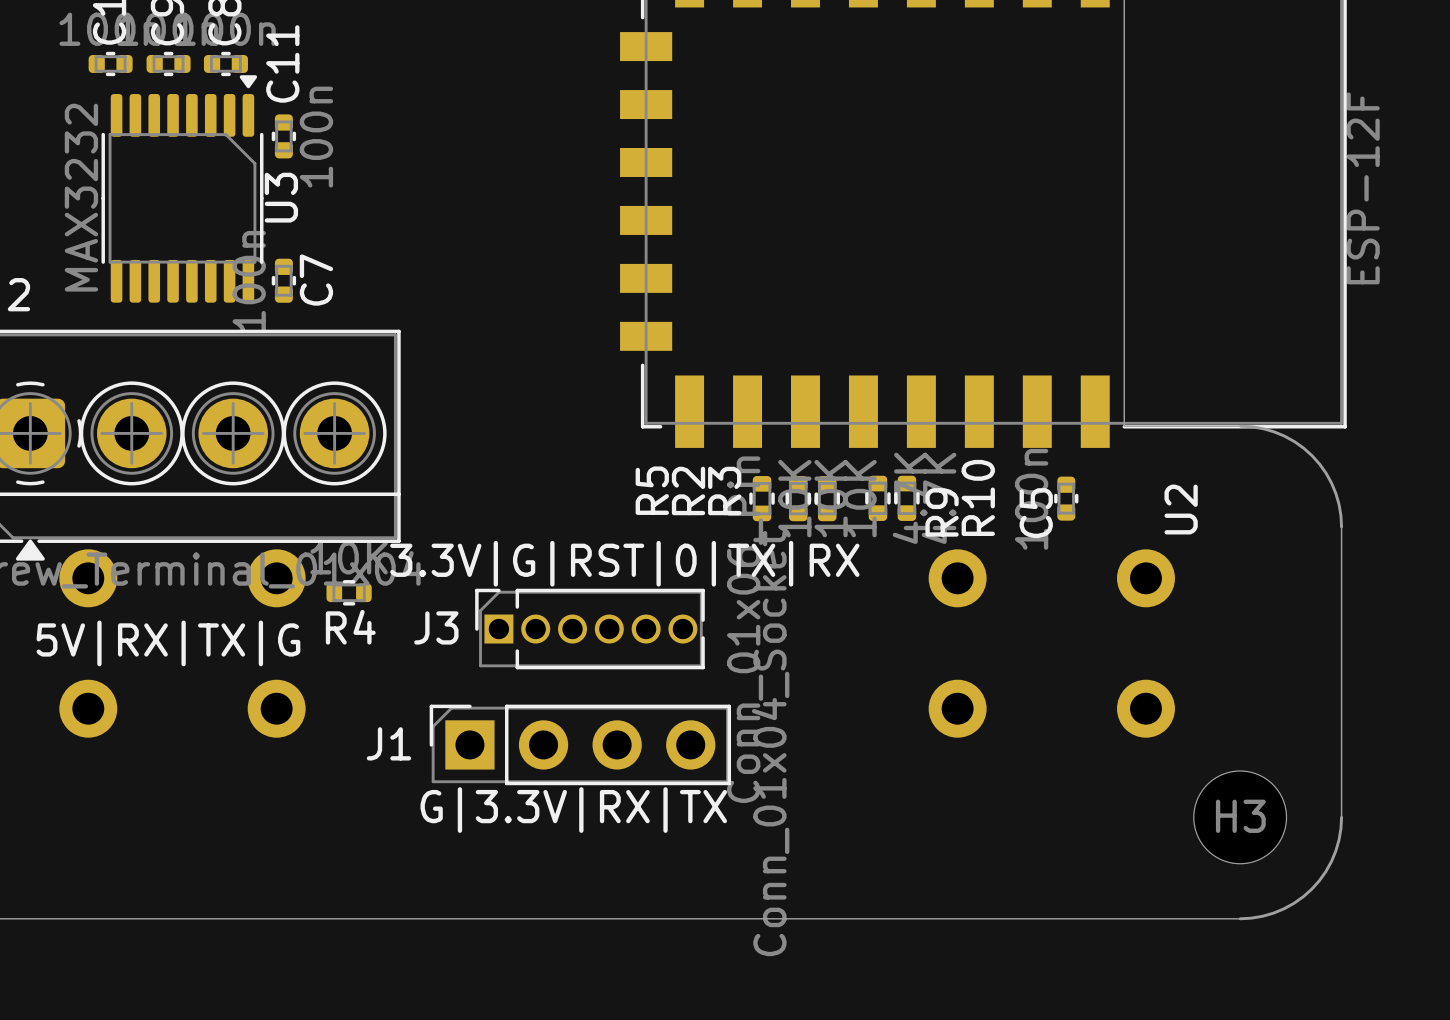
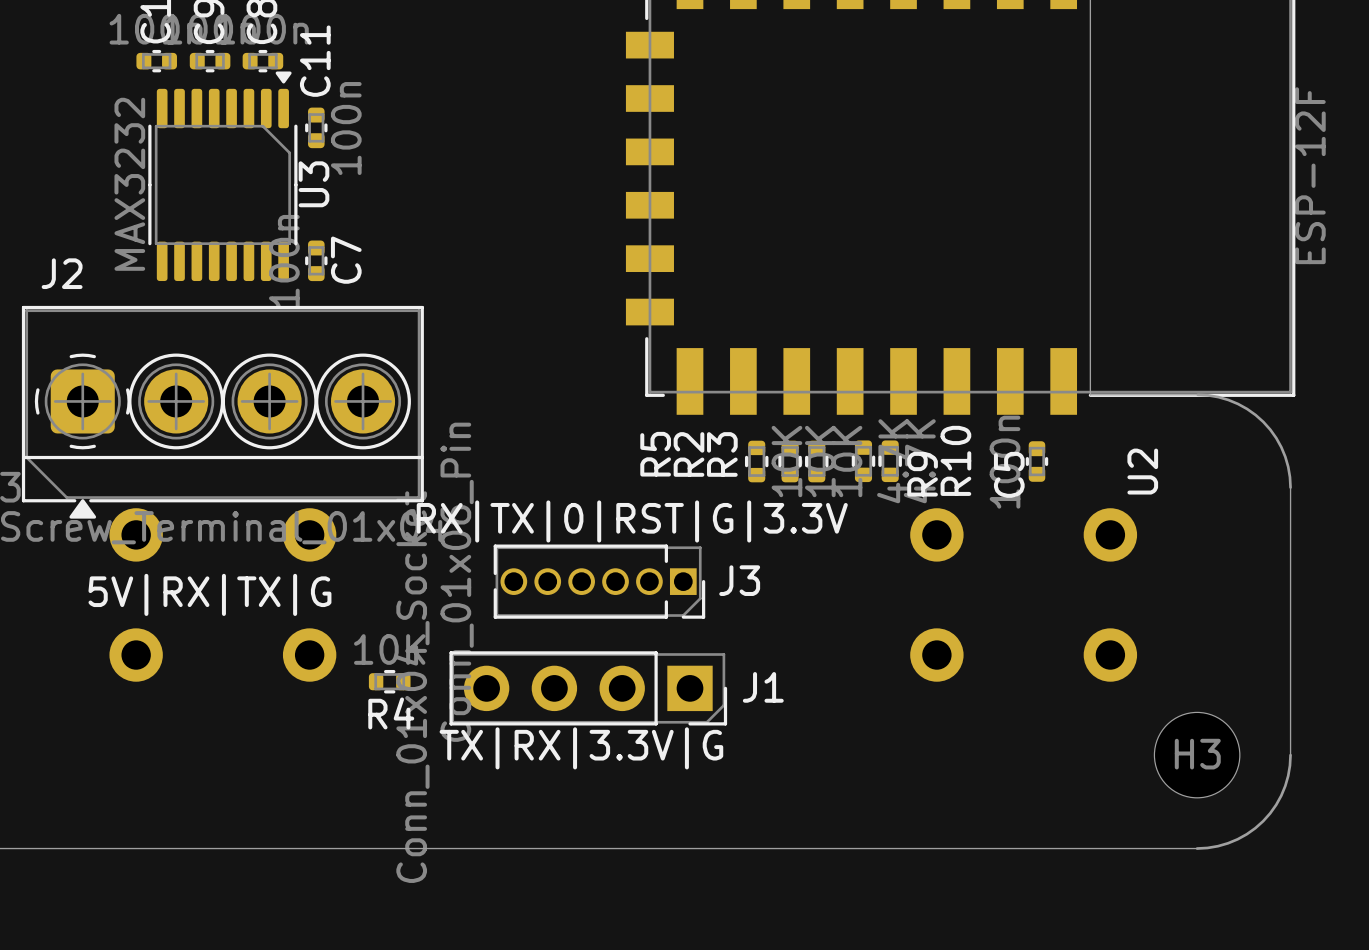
text: 3.3V|G|RST|0|TX|RX (624, 563) -> RX|TX|0|RST|G|3.3V (632, 521)
R4 position: (349, 592) -> (389, 681)
J3 rotation: 0° (589, 629) -> 180° (599, 581)
J1 rotation: 0° (580, 744) -> 180° (588, 688)
text: G|3.3V|RX|TX (573, 810) -> TX|RX|3.3V|G (581, 748)

